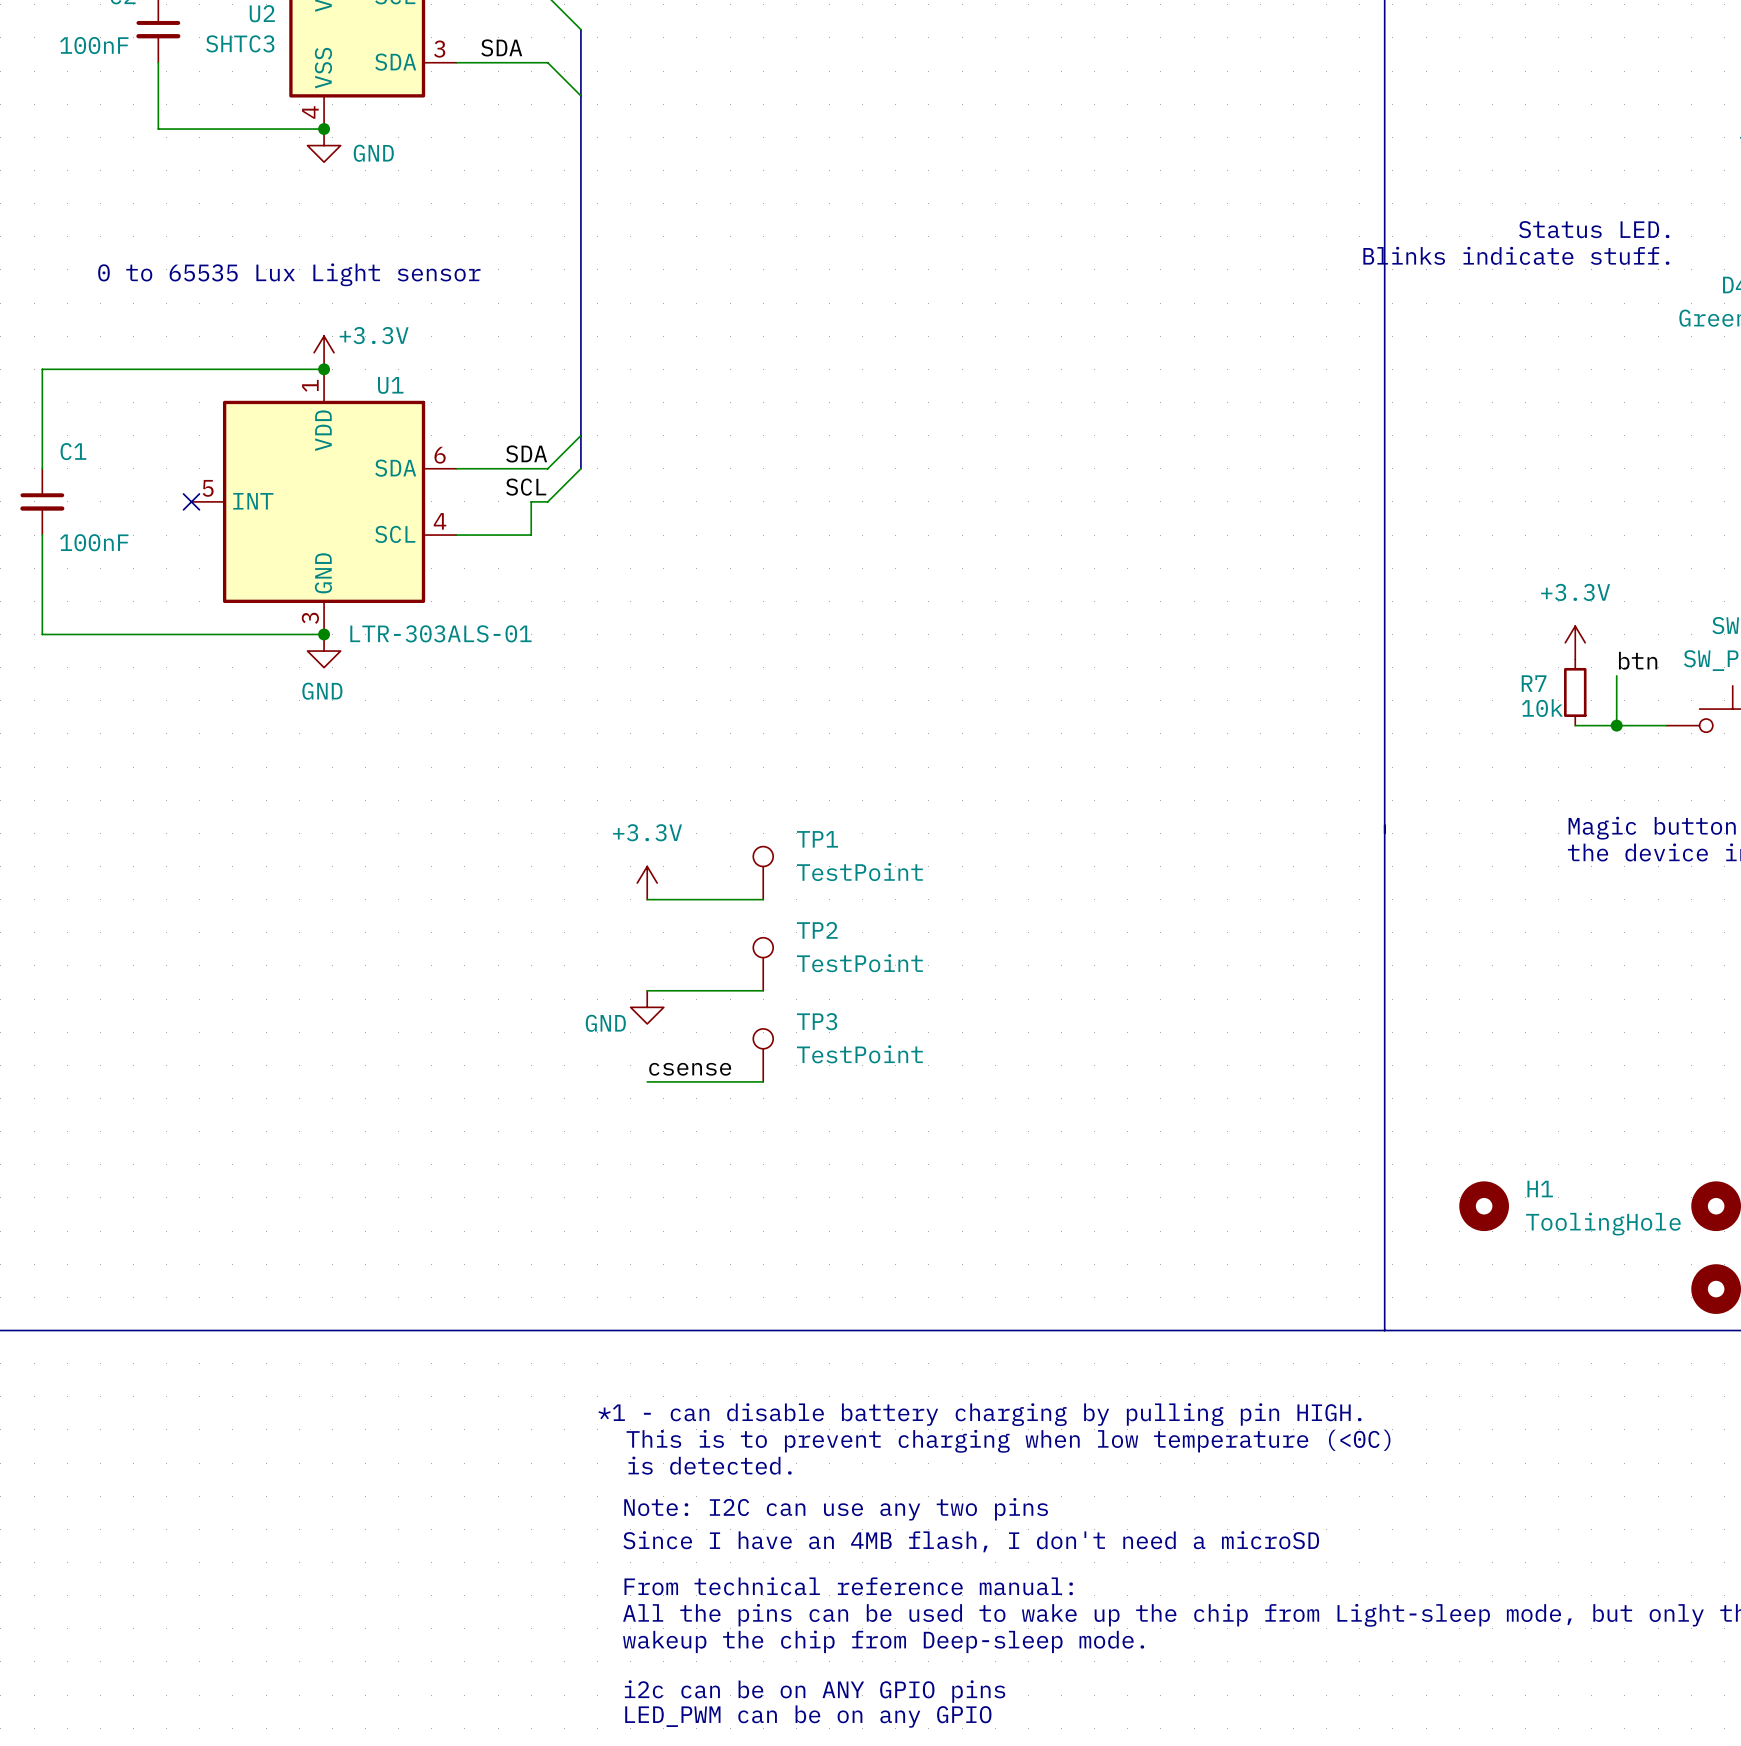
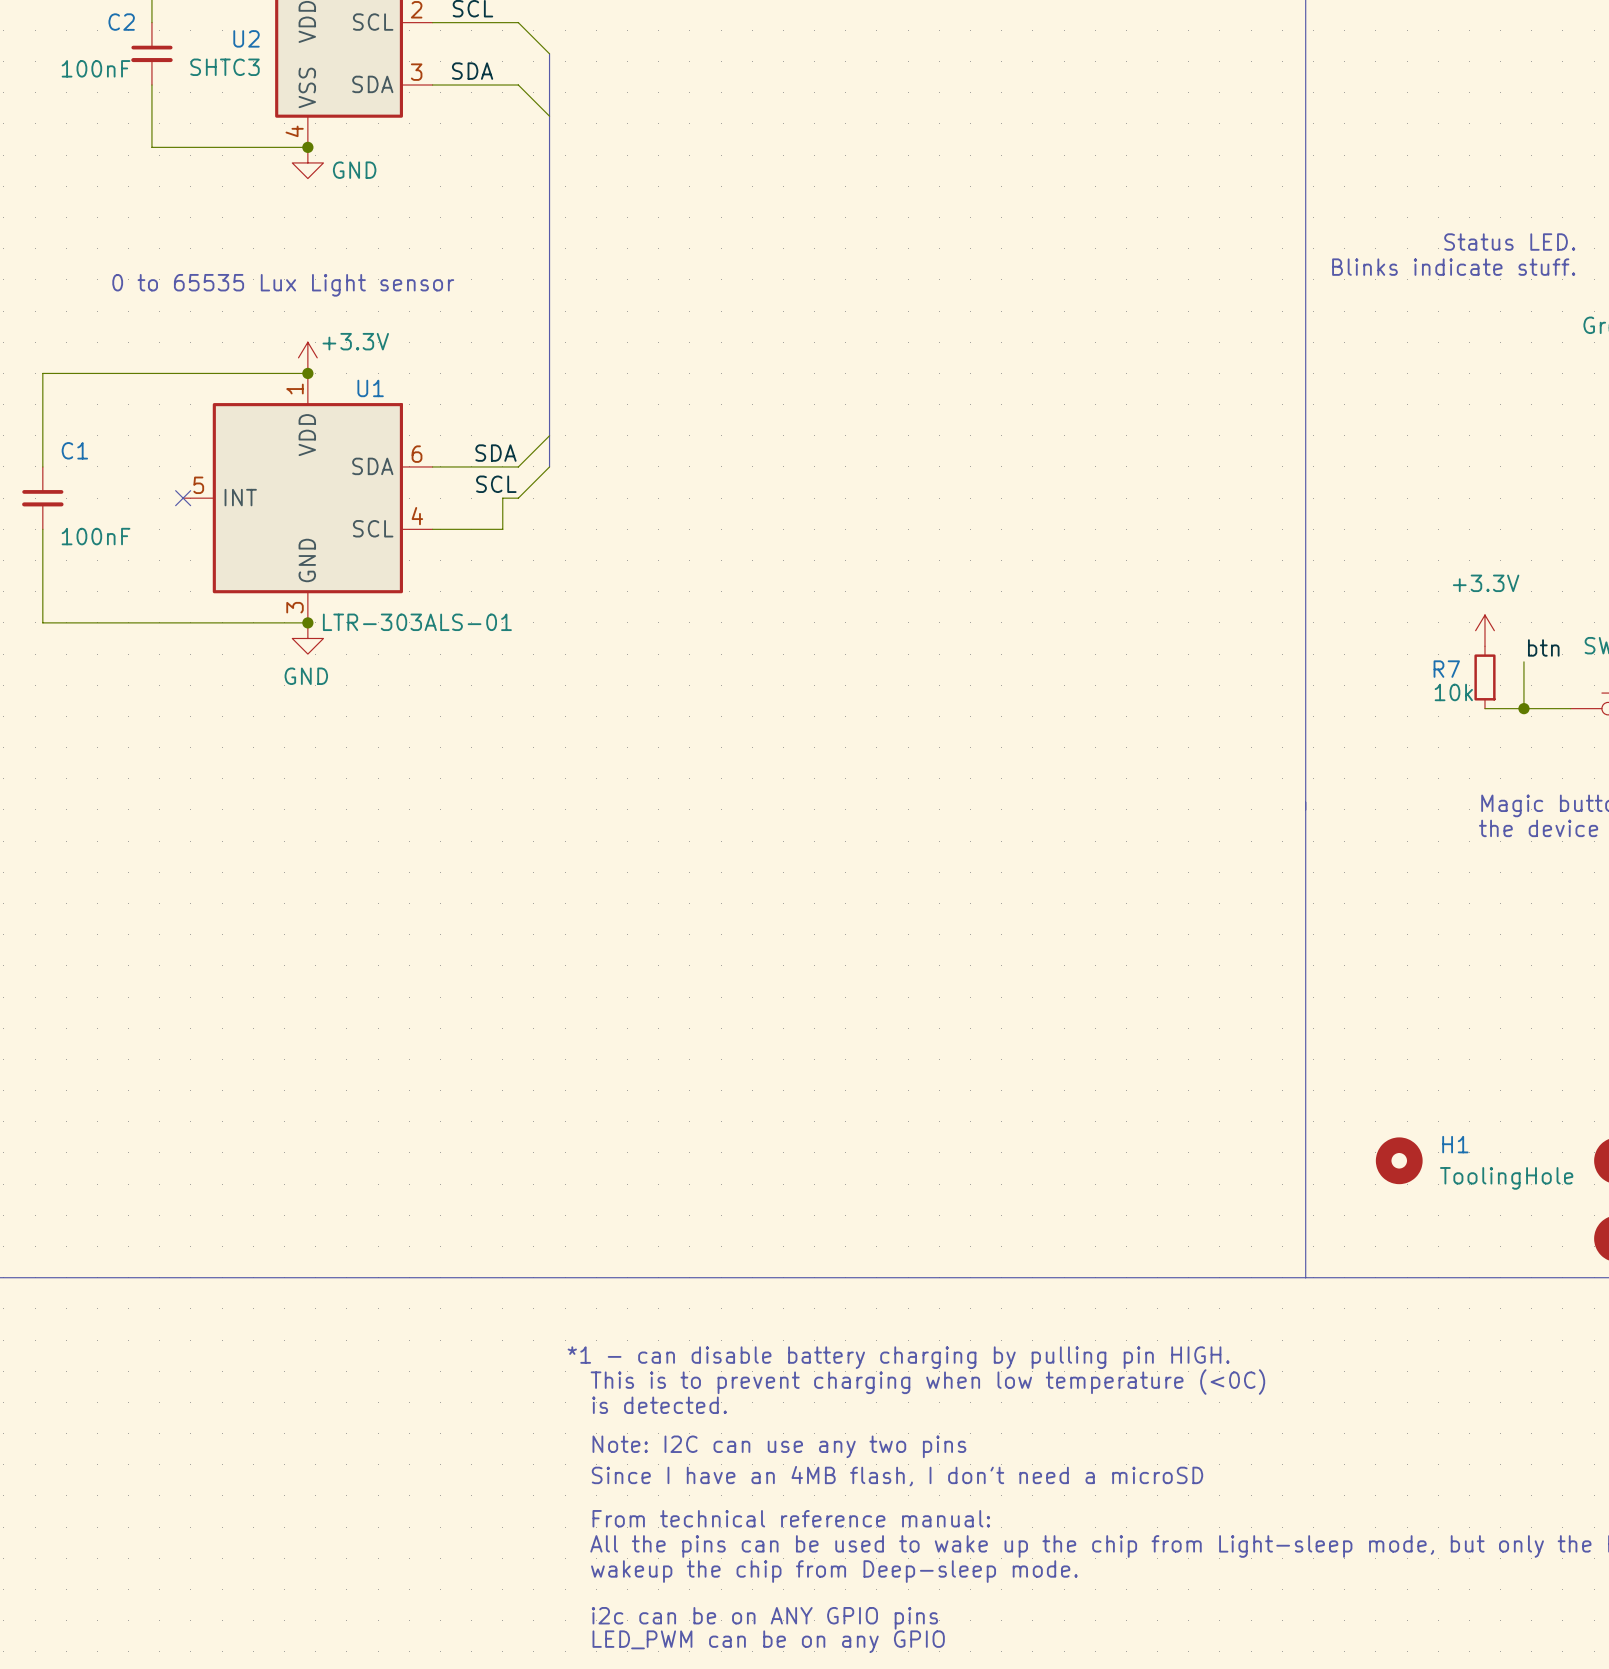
TP1: TestPoint (763, 873) -> none
power symbol: +3.3V (647, 883) -> none
wire: (647, 899) (763, 899) -> none
TP2: TestPoint (763, 964) -> none
wire: (647, 990) (763, 990) -> none
power symbol: GND (647, 1007) -> none
TP3: TestPoint (763, 1055) -> none
label: csense (690, 1069) -> none
wire: (647, 1081) (763, 1081) -> none

